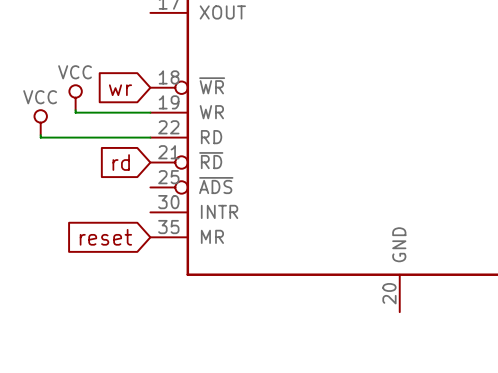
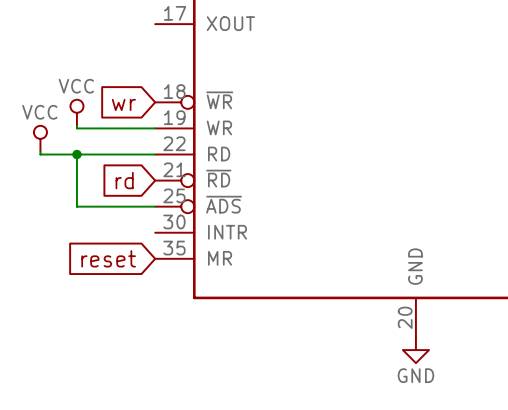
wire: none -> (76, 154) (76, 206) (155, 206)
junction: none -> (76, 154)
power symbol: none -> GND (415, 350)

